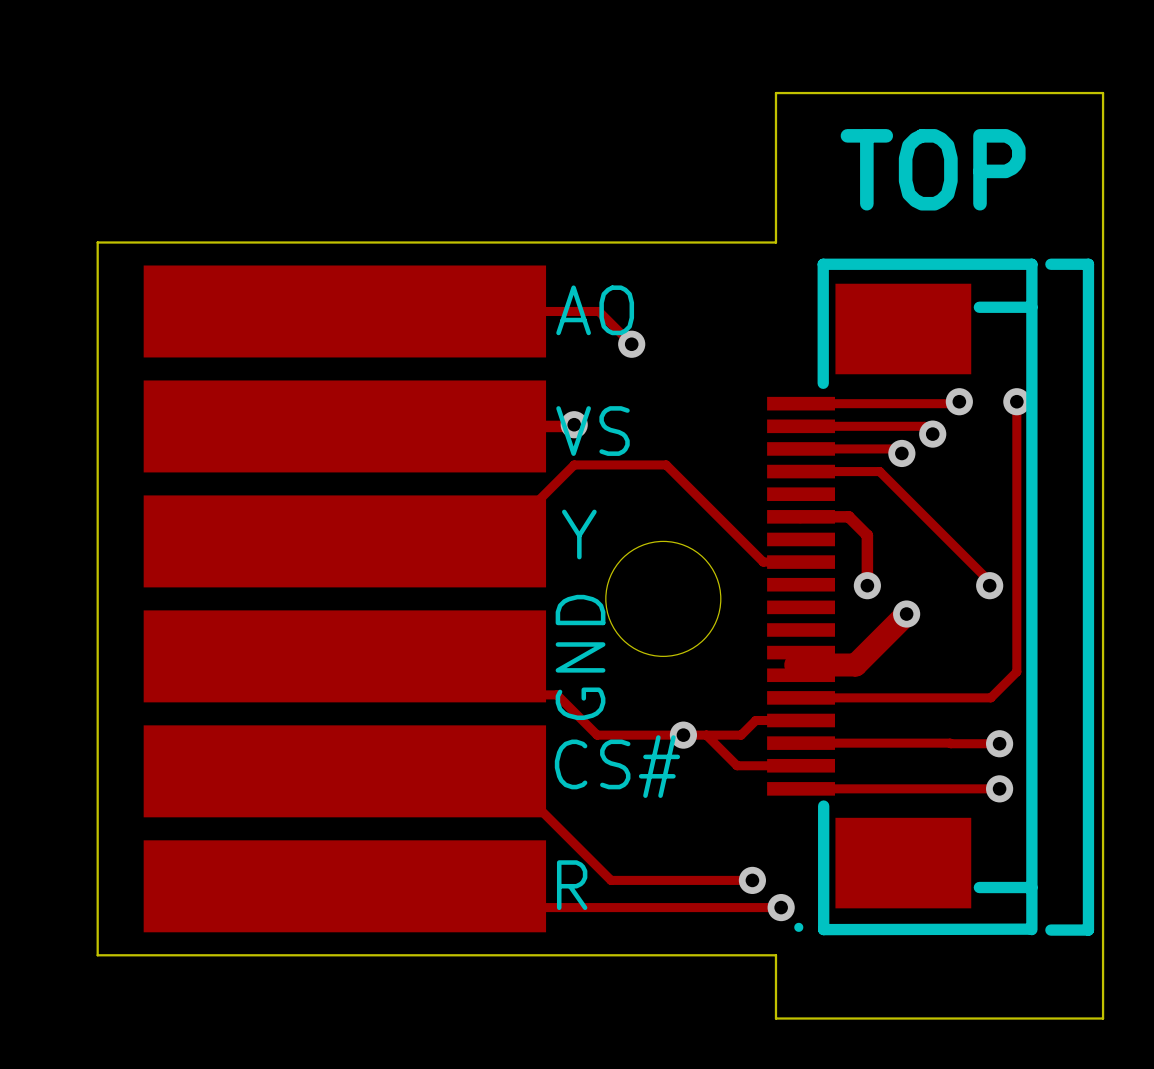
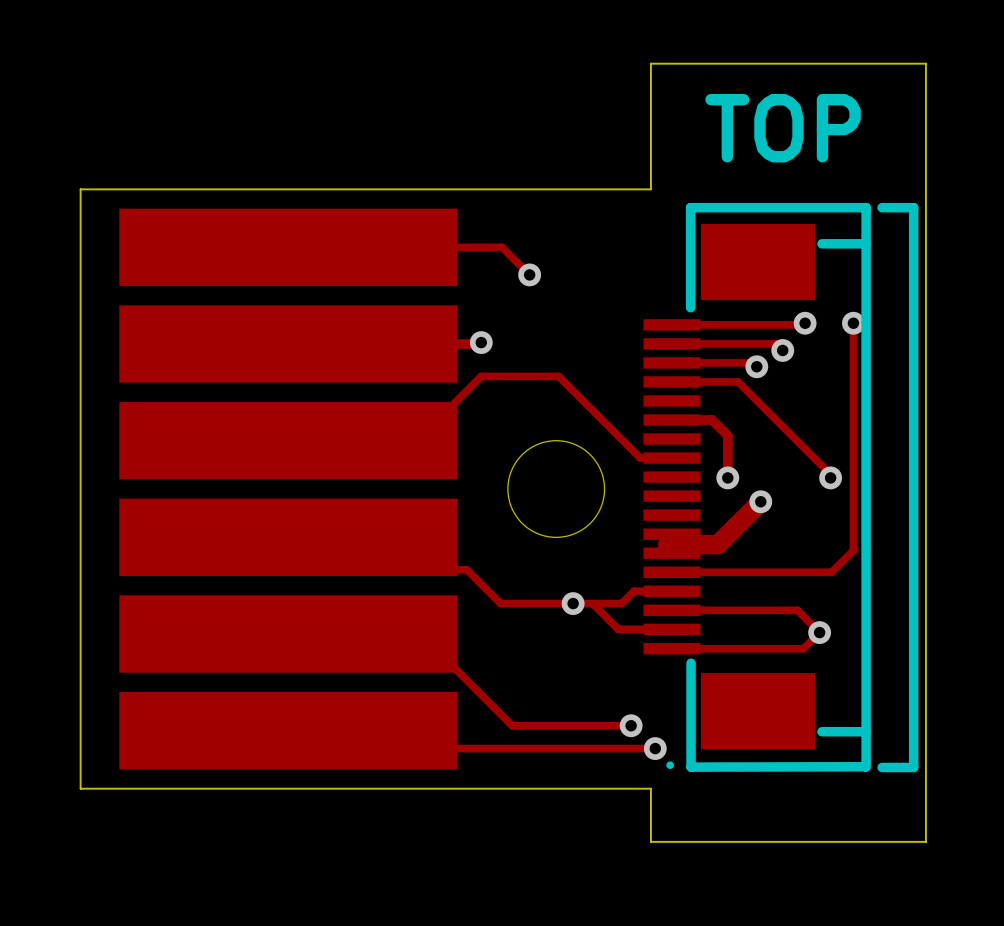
text: AO (595, 310) -> none
text: VS (593, 431) -> none
text: Y (579, 534) -> none
text: GND (580, 657) -> none
track: (950, 743) (999, 743) -> (797, 610) (819, 632) (803, 648)
via: (999, 743) -> none
text: CS# (617, 766) -> none
via: none -> (819, 632)
track: (957, 788) (999, 788) -> none
via: (999, 788) -> none
text: R (572, 885) -> none

